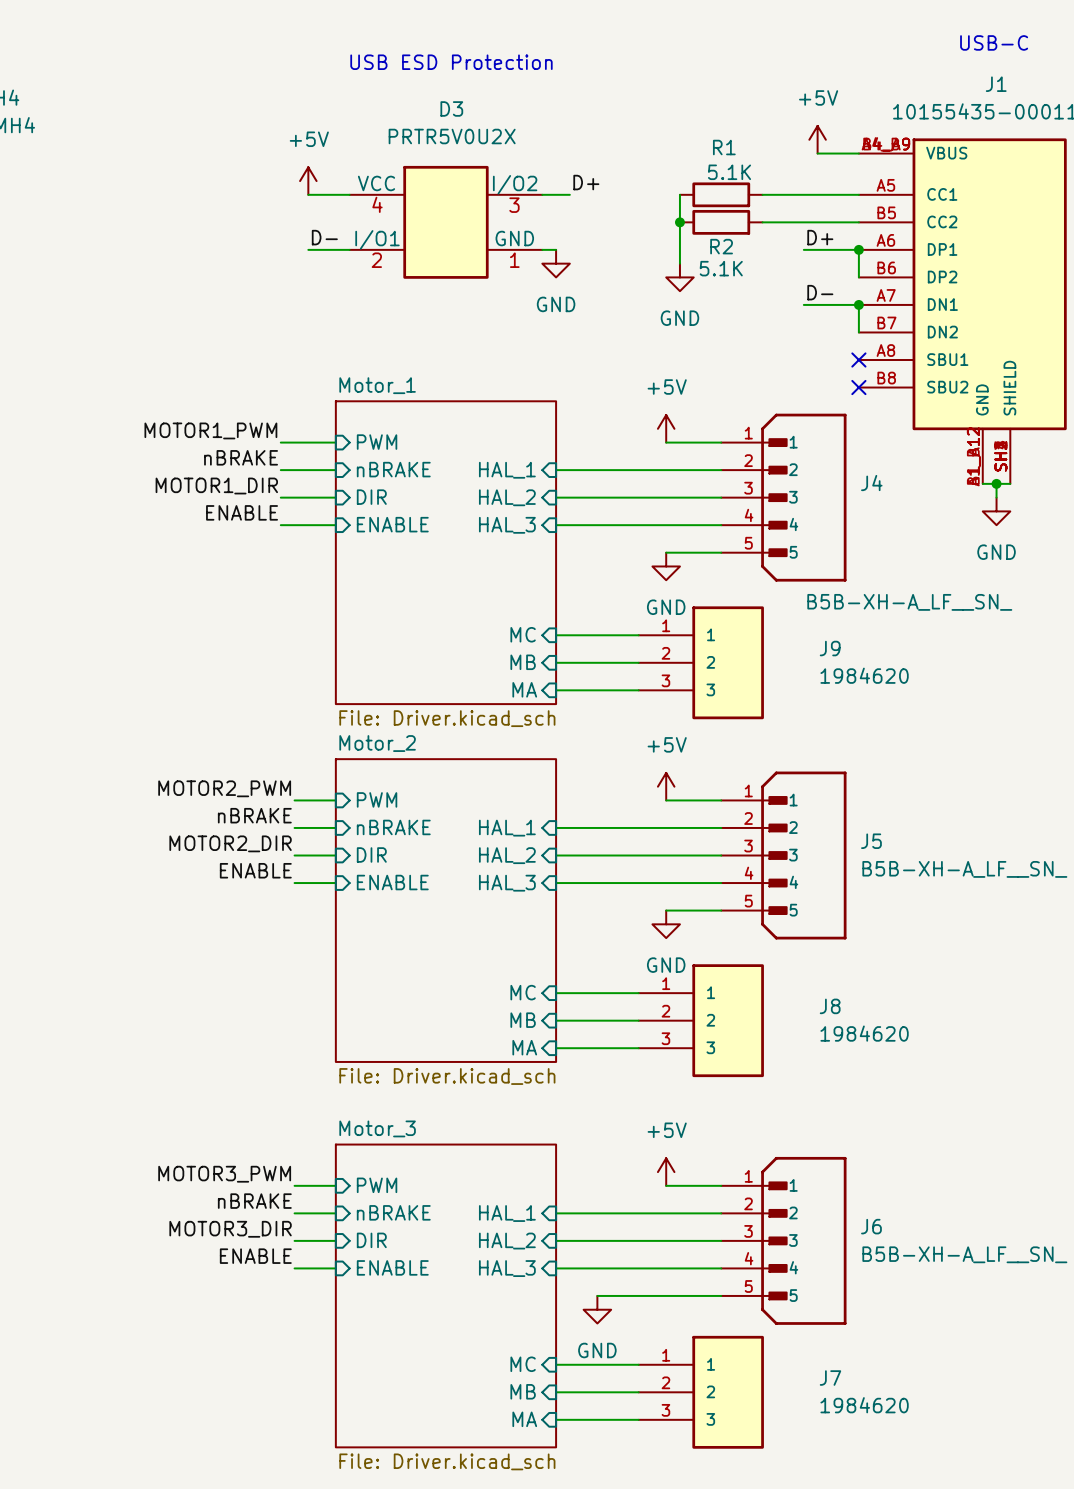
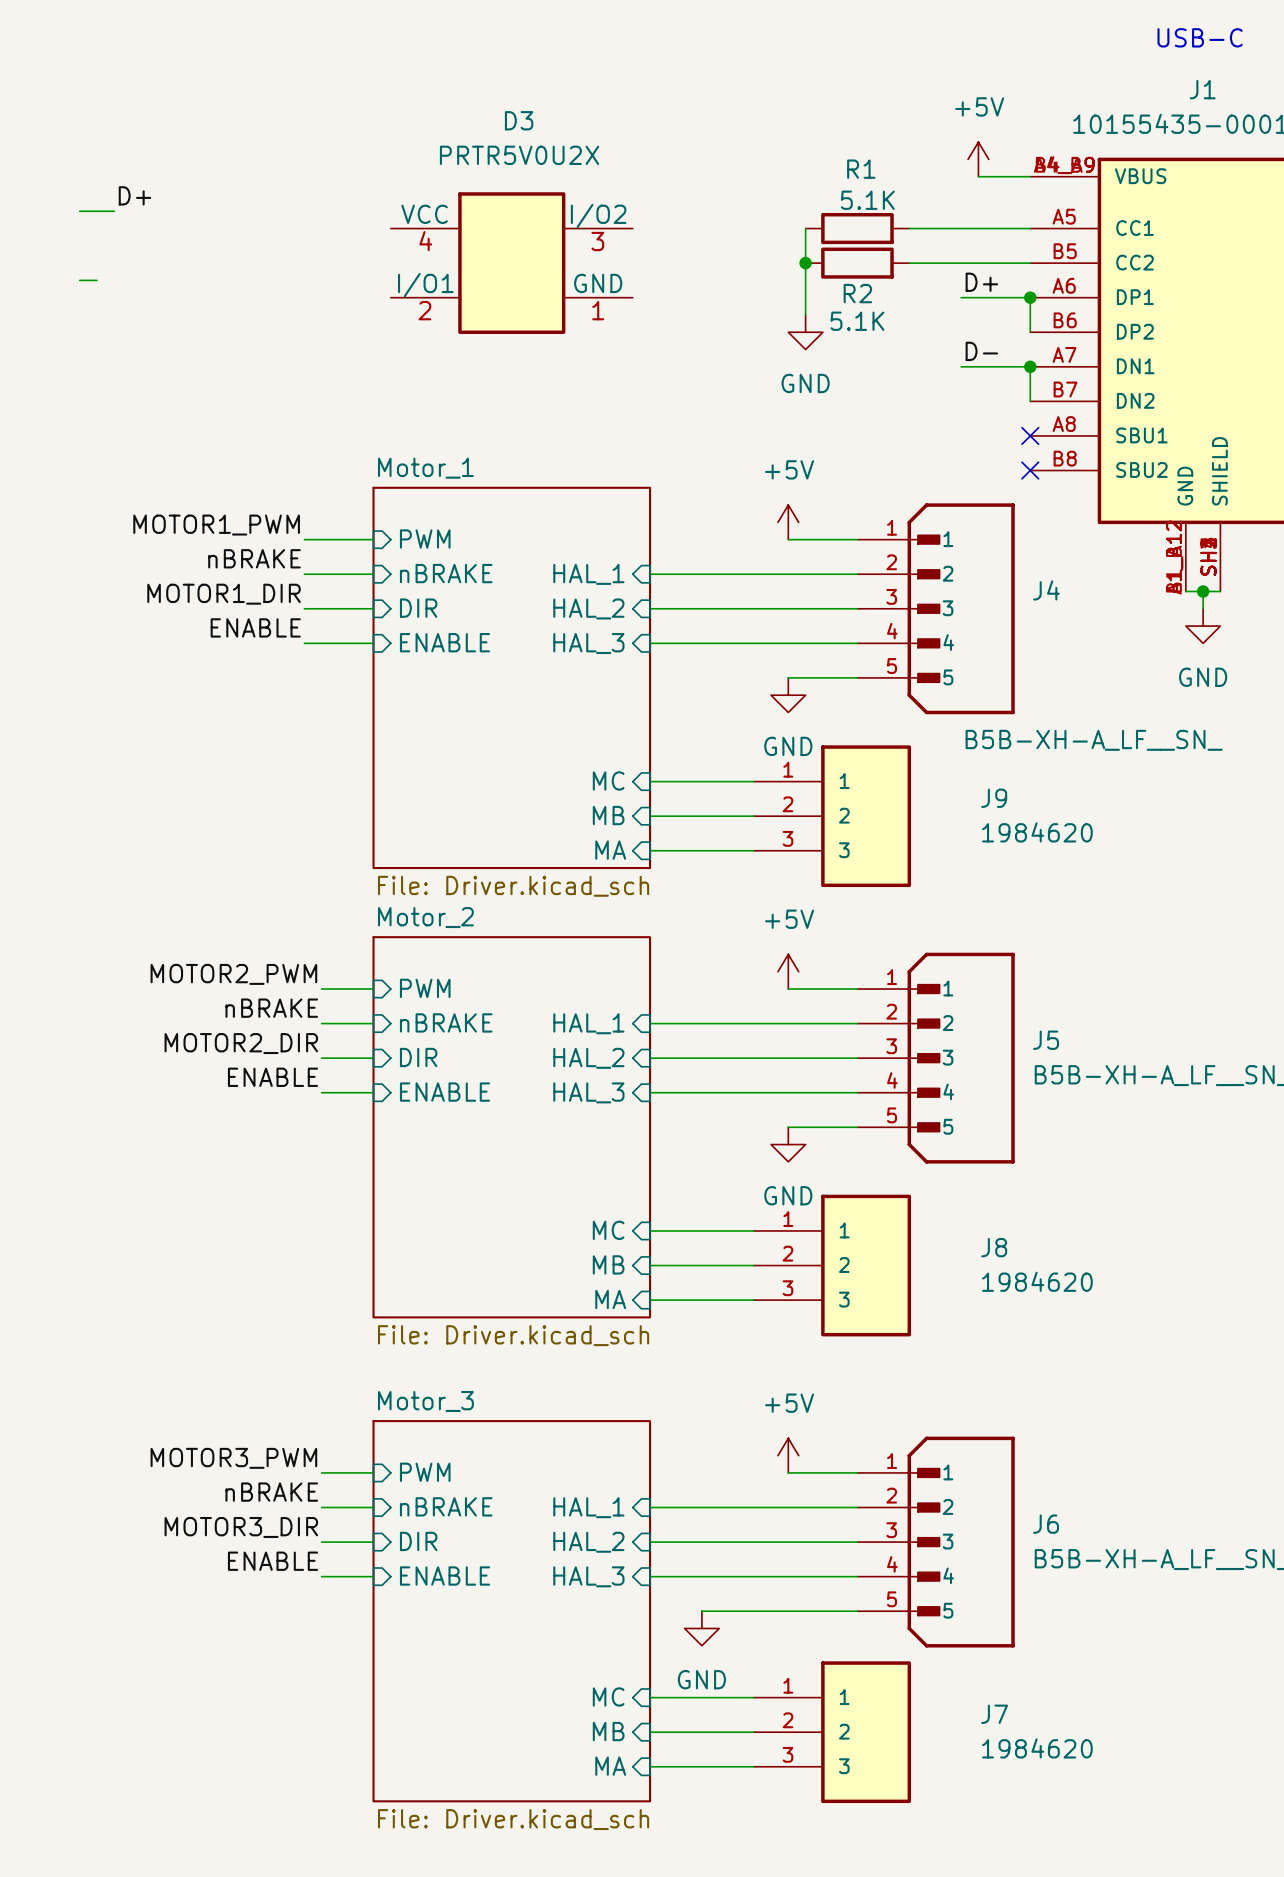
text: USB ESD Protection (451, 62) -> none
label: none -> D+ (134, 195)
wire: none -> (79, 211) (114, 211)
power symbol: +5V (308, 181) -> none
label: D+ (586, 182) -> none
wire: (308, 194) (349, 194) -> none
wire: (542, 194) (569, 194) -> none
wire: none -> (79, 280) (96, 280)
label: D- (324, 237) -> none
wire: (308, 249) (349, 249) -> none
wire: (542, 249) (556, 249) -> none
power symbol: GND (556, 263) -> none

